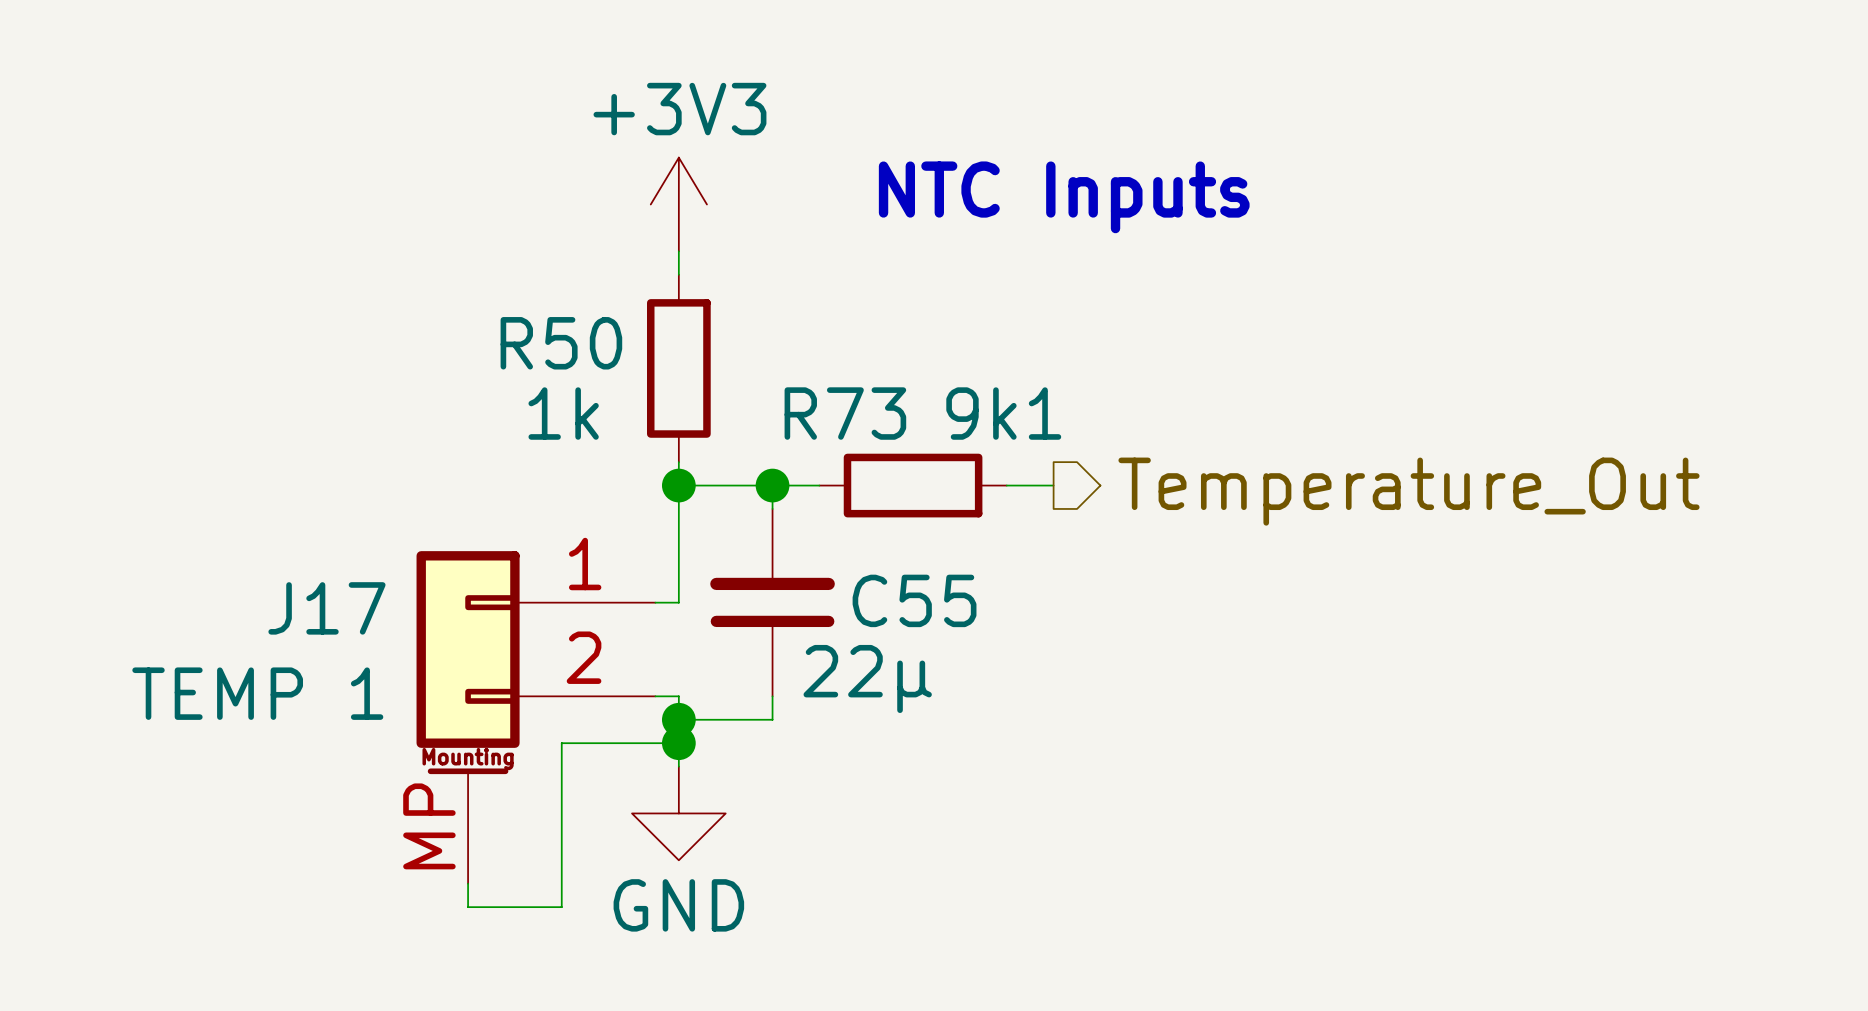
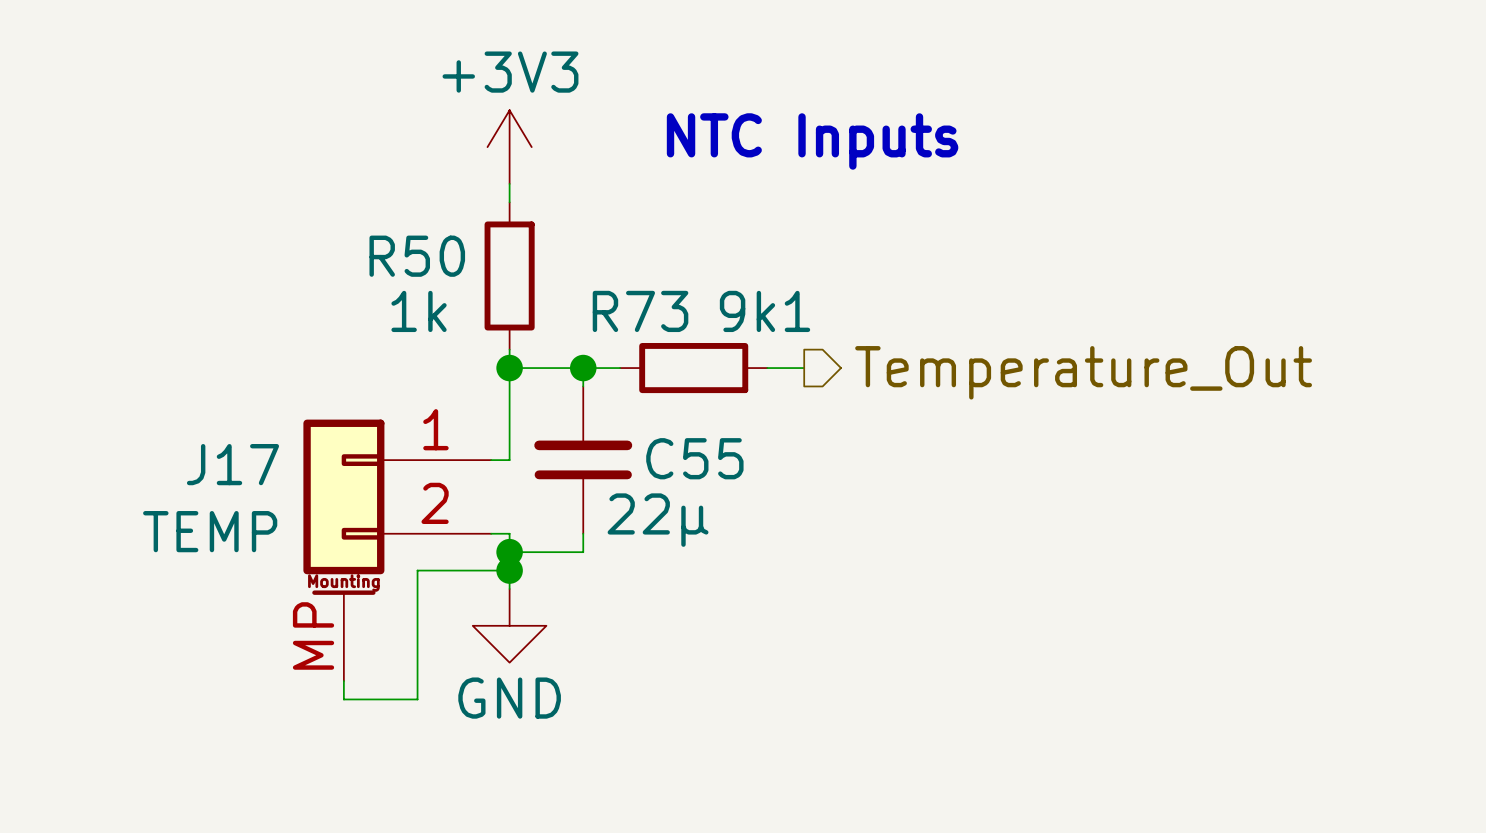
J17 value: TEMP 1 (257, 693) -> TEMP (210, 531)

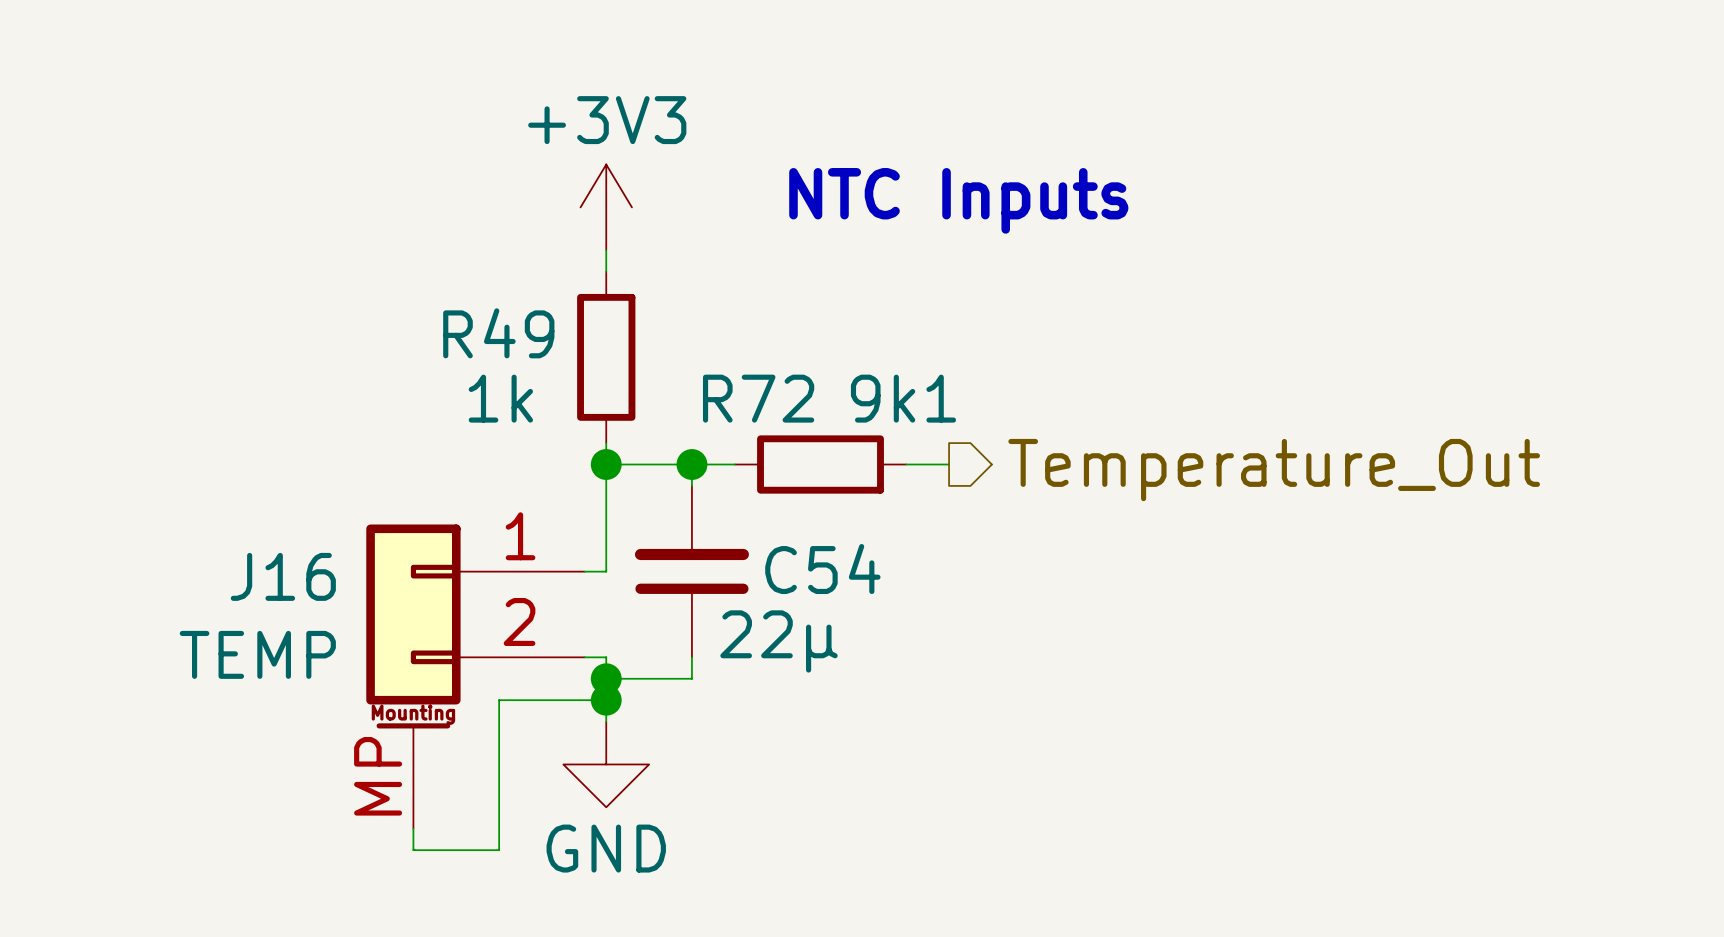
R50 name: R50 (417, 256) -> R49 (498, 333)
R73 name: R73 (640, 311) -> R72 (758, 398)
C55 name: C55 (694, 458) -> C54 (822, 569)
J17 name: J17 (232, 464) -> J16 (283, 576)

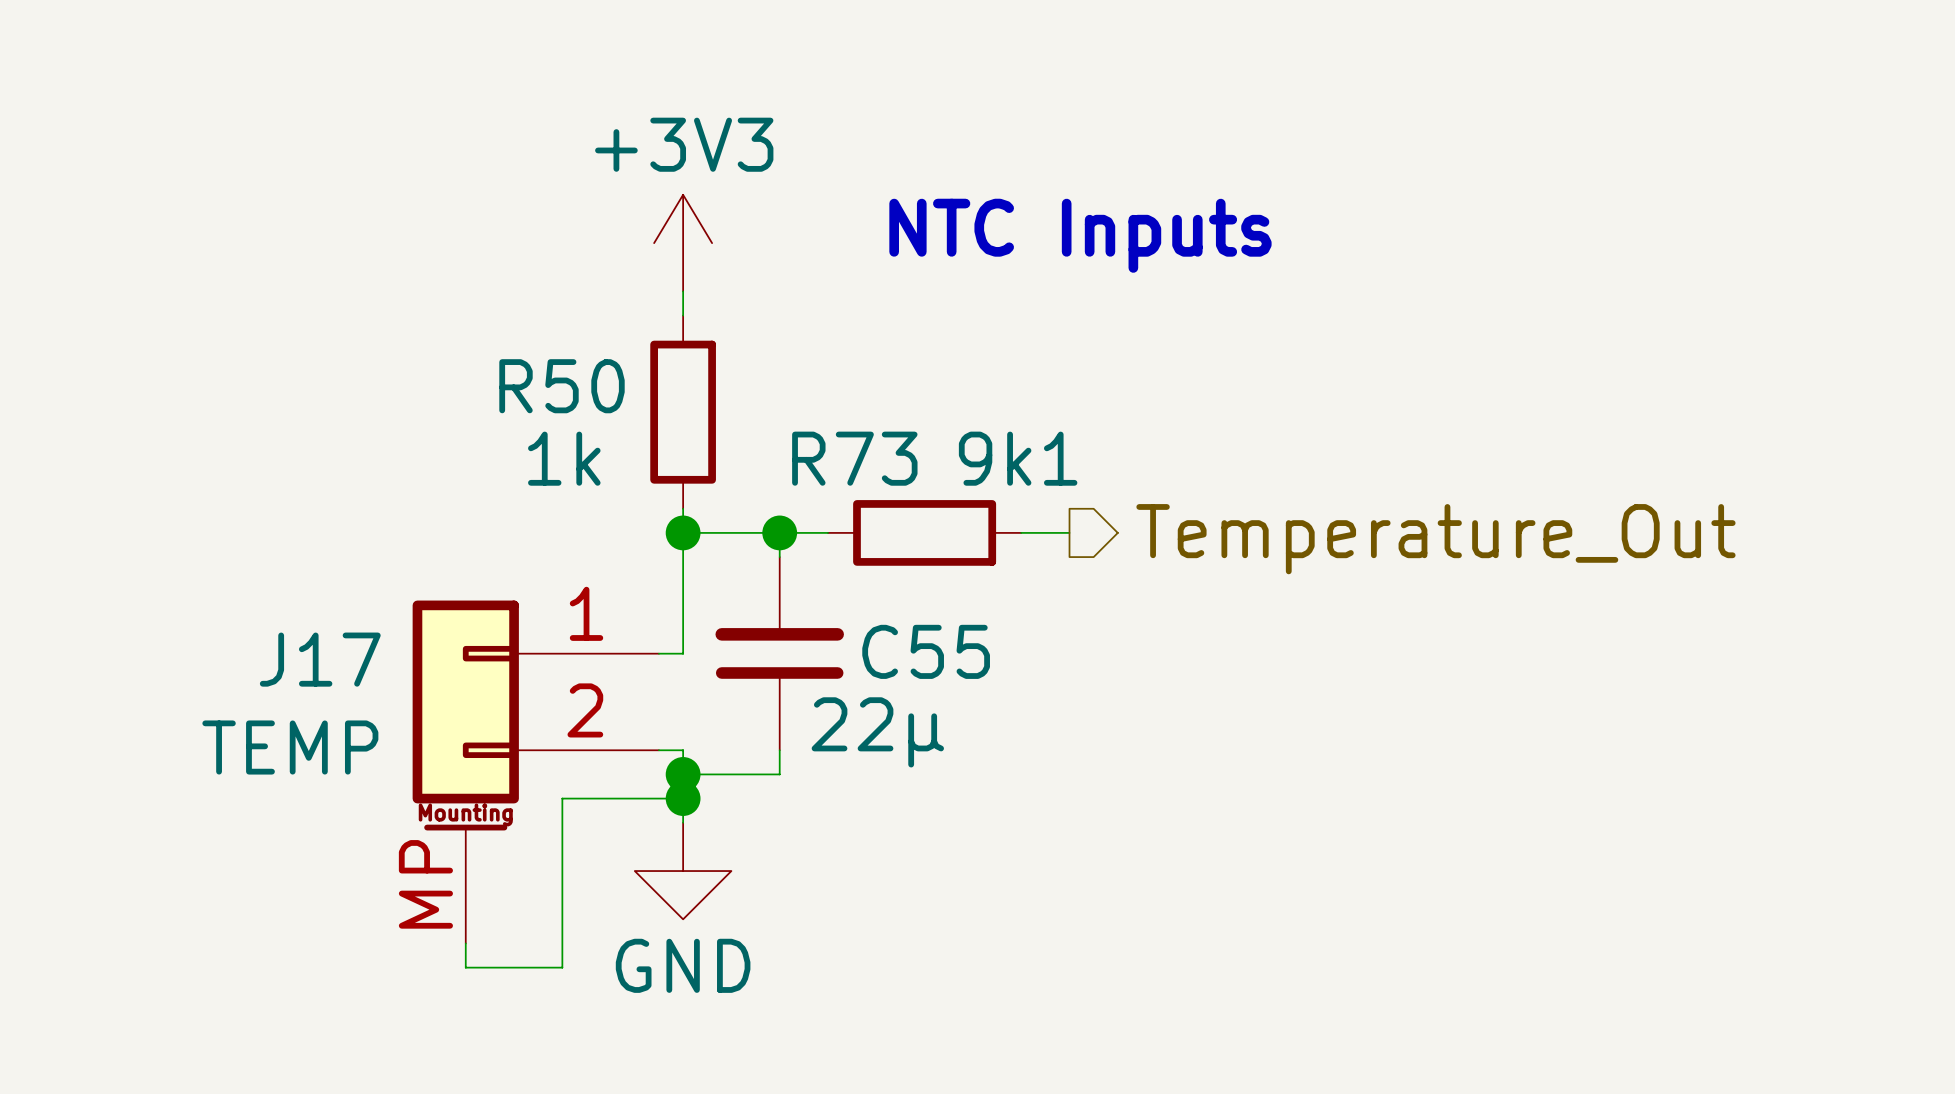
R49 name: R49 (498, 333) -> R50 (562, 386)
R72 name: R72 (758, 398) -> R73 (854, 458)
C54 name: C54 (822, 569) -> C55 (926, 651)
J16 name: J16 (283, 576) -> J17 (320, 659)

